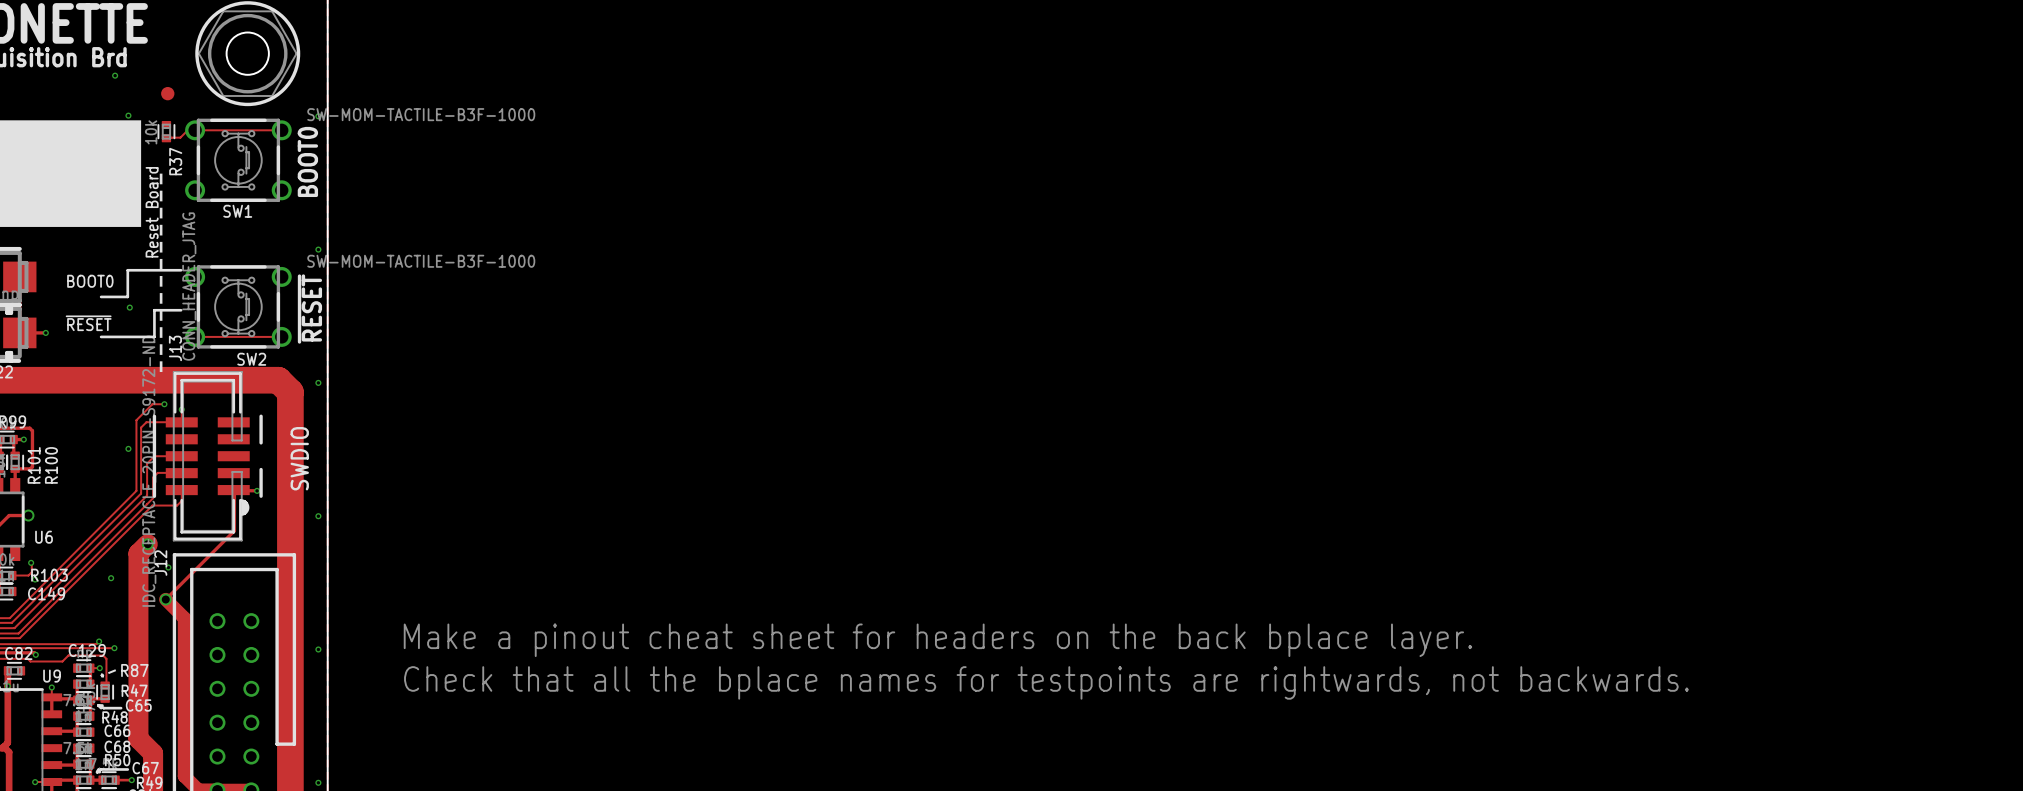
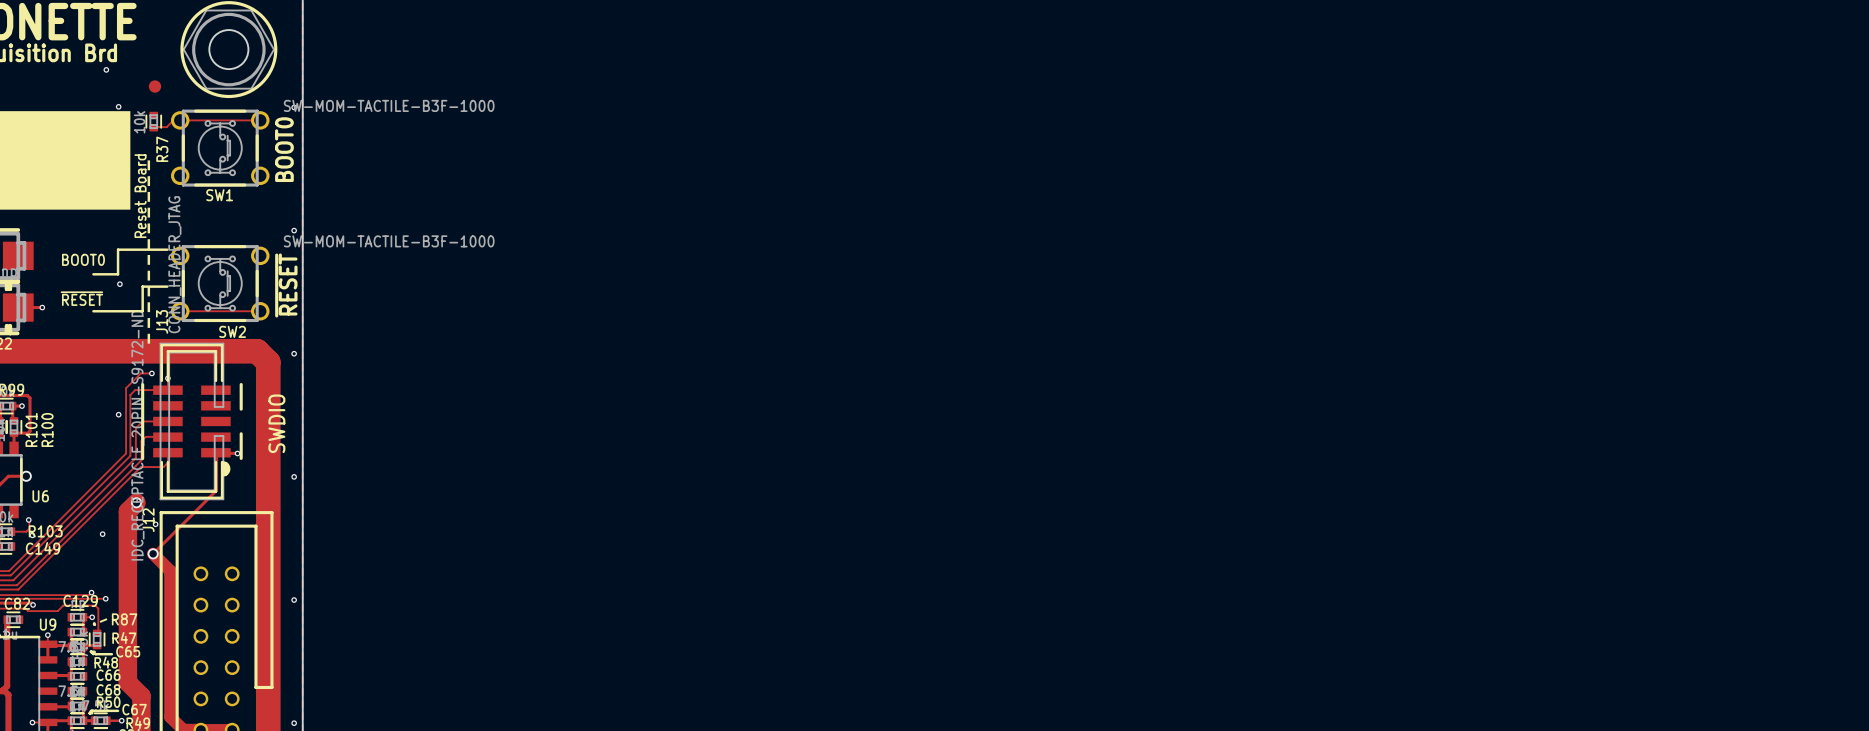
text: Make a pinout cheat sheet for headers on the back bplace layer. (937, 640) -> none
text: Check that all the bplace names for testpoints are rightwards, not backwards. (1046, 682) -> none

